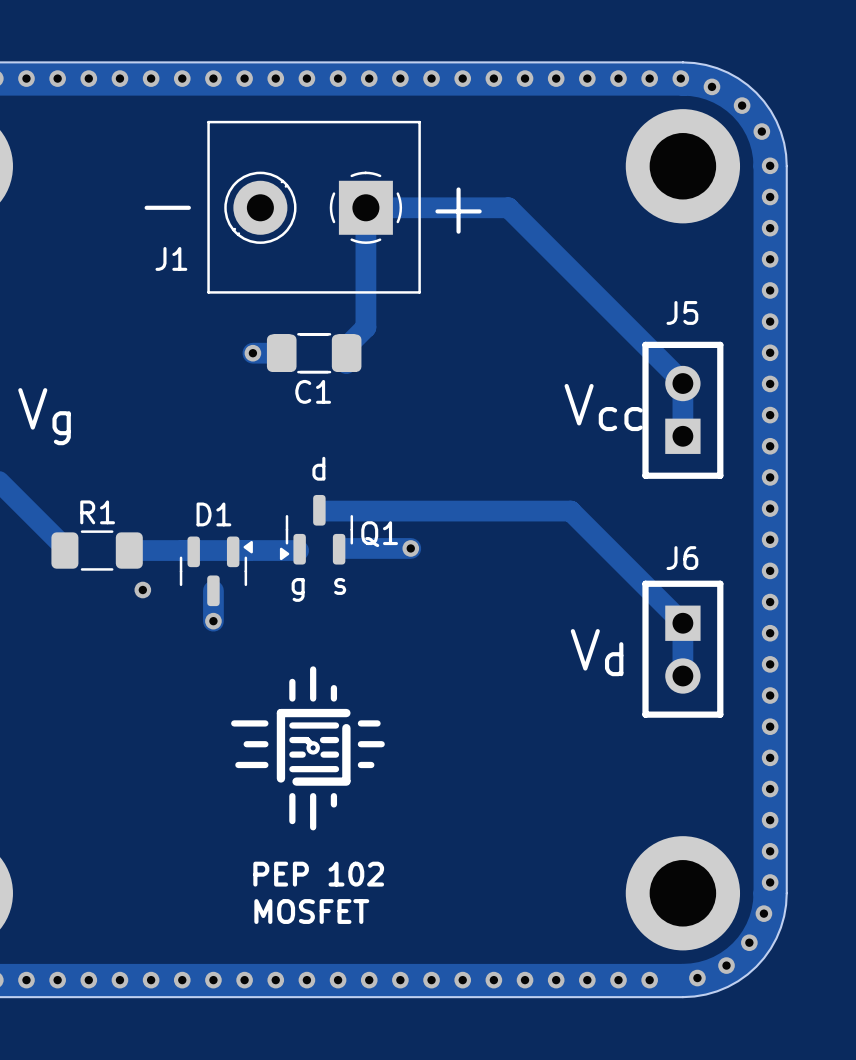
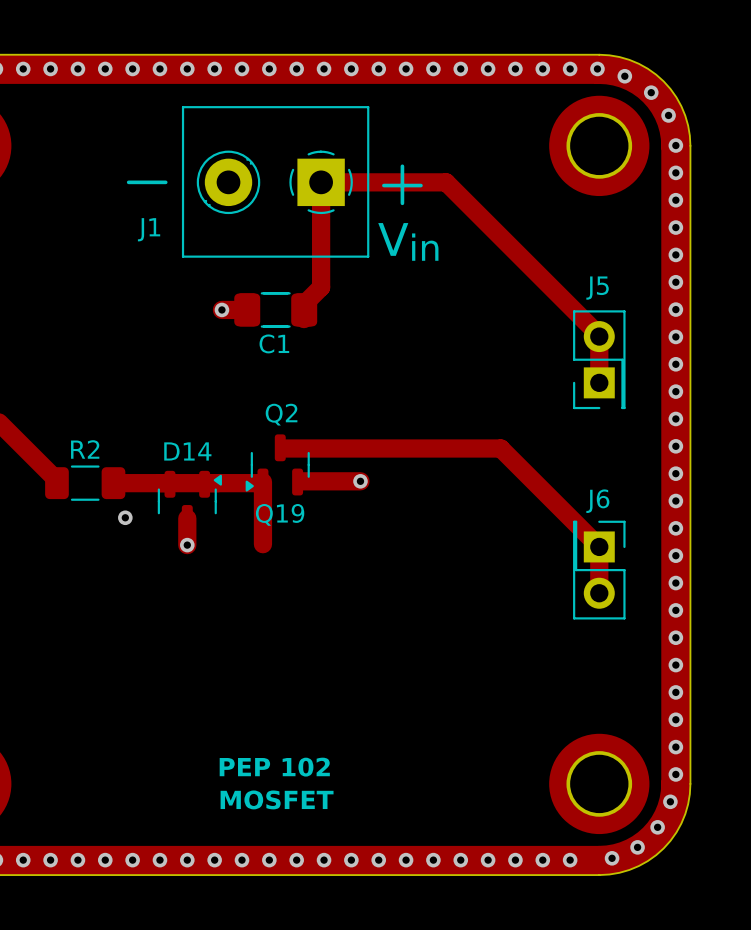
J1 text: none -> Vin (408, 241)
J5 footprint: [642, 341, 724, 479] -> [573, 310, 626, 410]
text: Vcc (603, 407) -> none
text: Vg (44, 416) -> none
text: d (318, 468) -> Q2 (281, 414)
R1 name: R1 (97, 512) -> R2 (85, 449)
D1 name: D1 (213, 514) -> D14 (187, 451)
Q1 name: Q1 (379, 534) -> Q19 (280, 514)
track: none -> (262, 482) (262, 544)
J6 footprint: [642, 580, 724, 718] -> [573, 520, 626, 620]
text: s (340, 586) -> none
text: g (298, 589) -> none
text: Vd (597, 652) -> none
drawing: [231, 666, 385, 831] -> none

